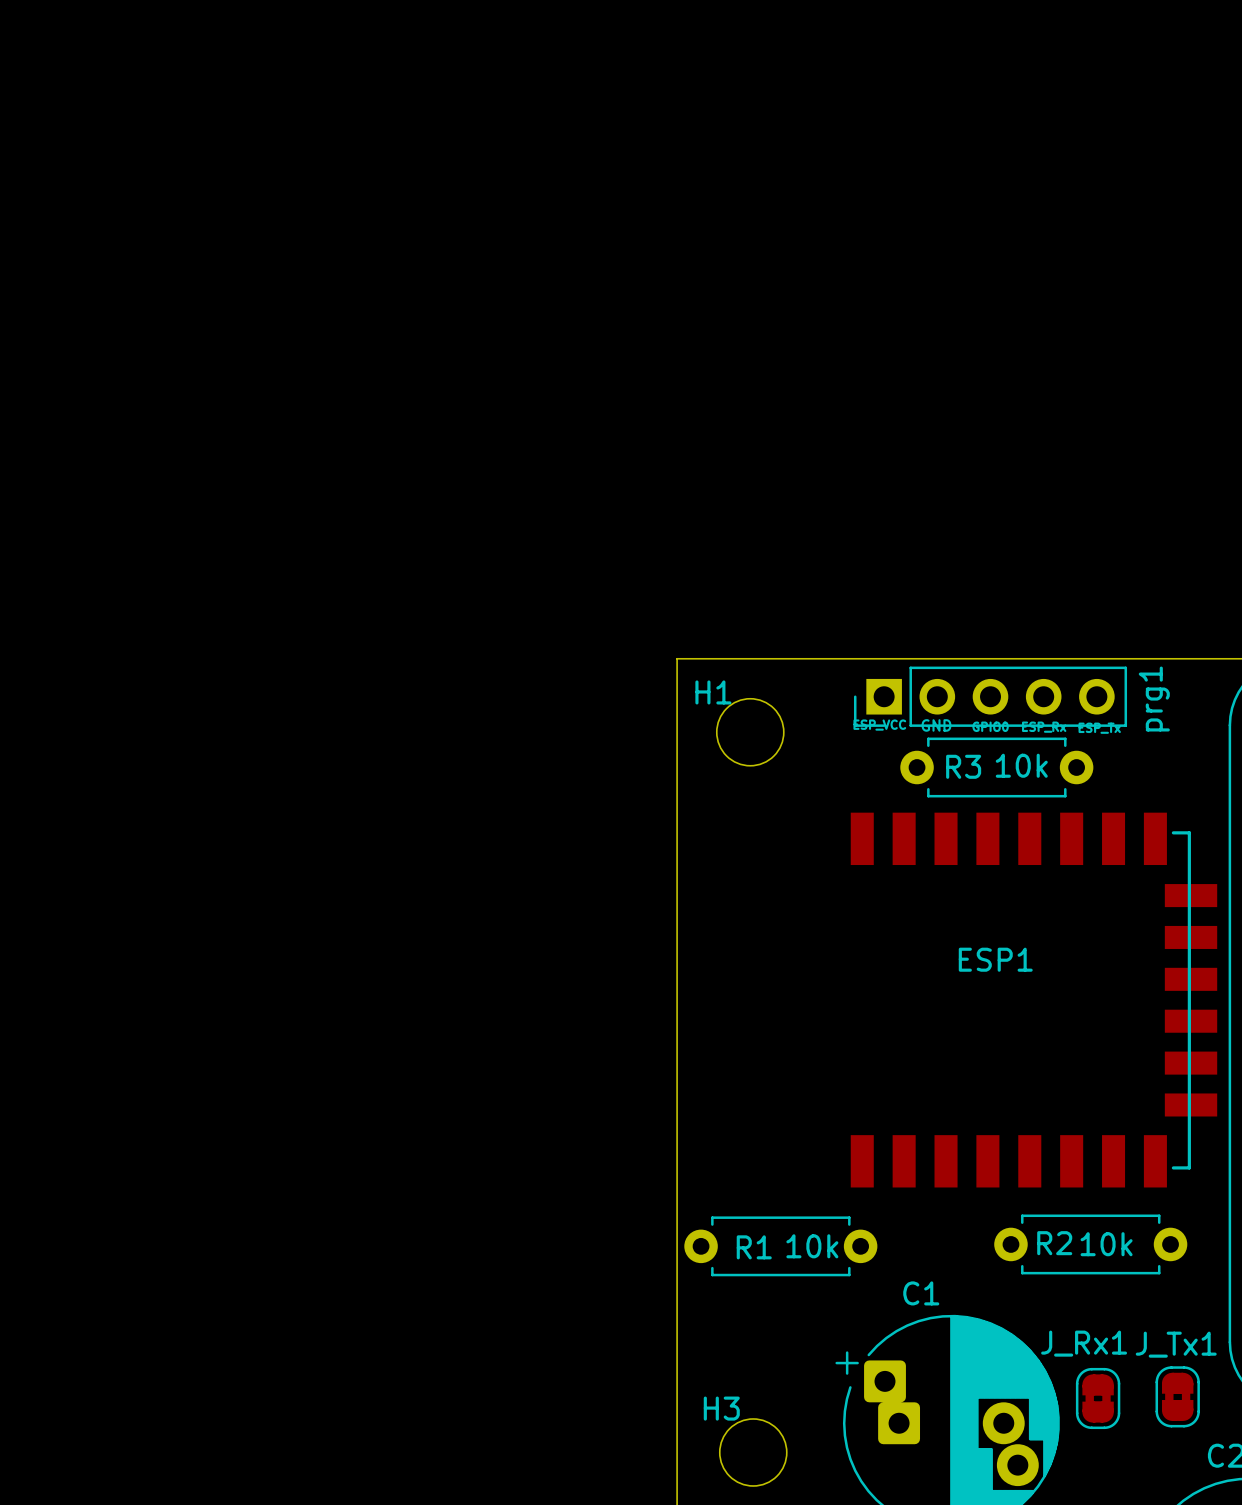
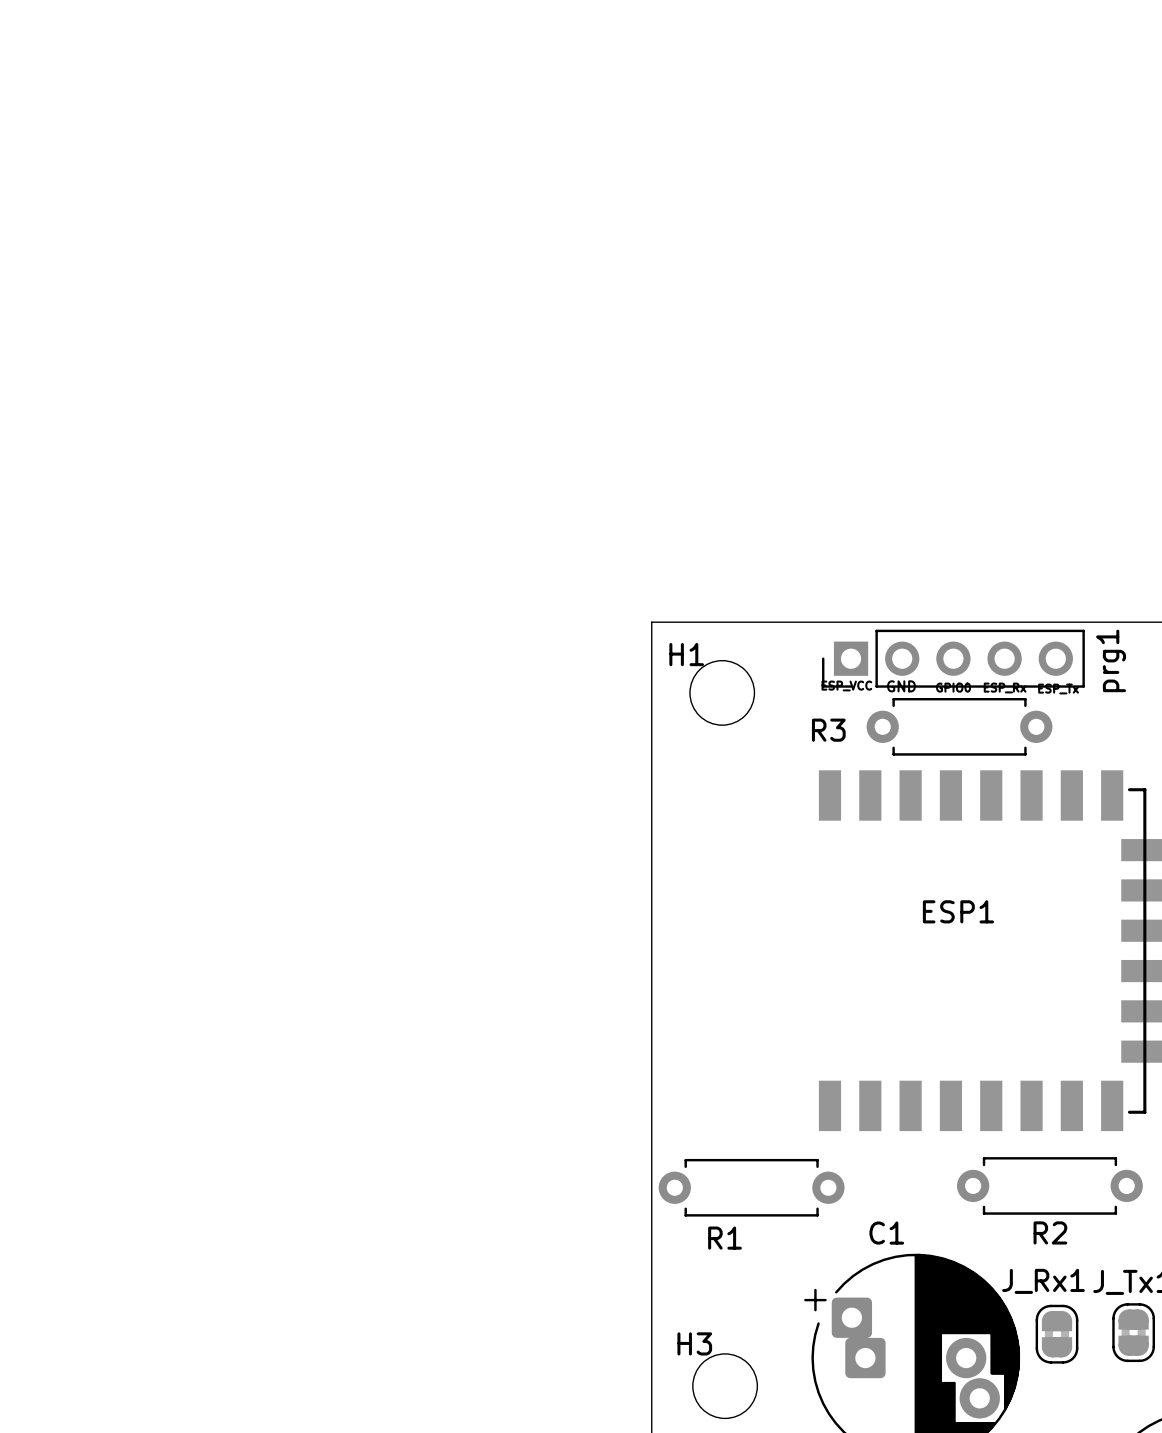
R3 value: 10k (1021, 765) -> none
R3 name position: R3 (963, 766) -> R3 (828, 730)
R2 name position: R2 (1054, 1243) -> R2 (1050, 1232)
R2 value: 10k (1106, 1244) -> none
R1 value: 10k (812, 1246) -> none
R1 name position: R1 (754, 1247) -> R1 (725, 1238)

